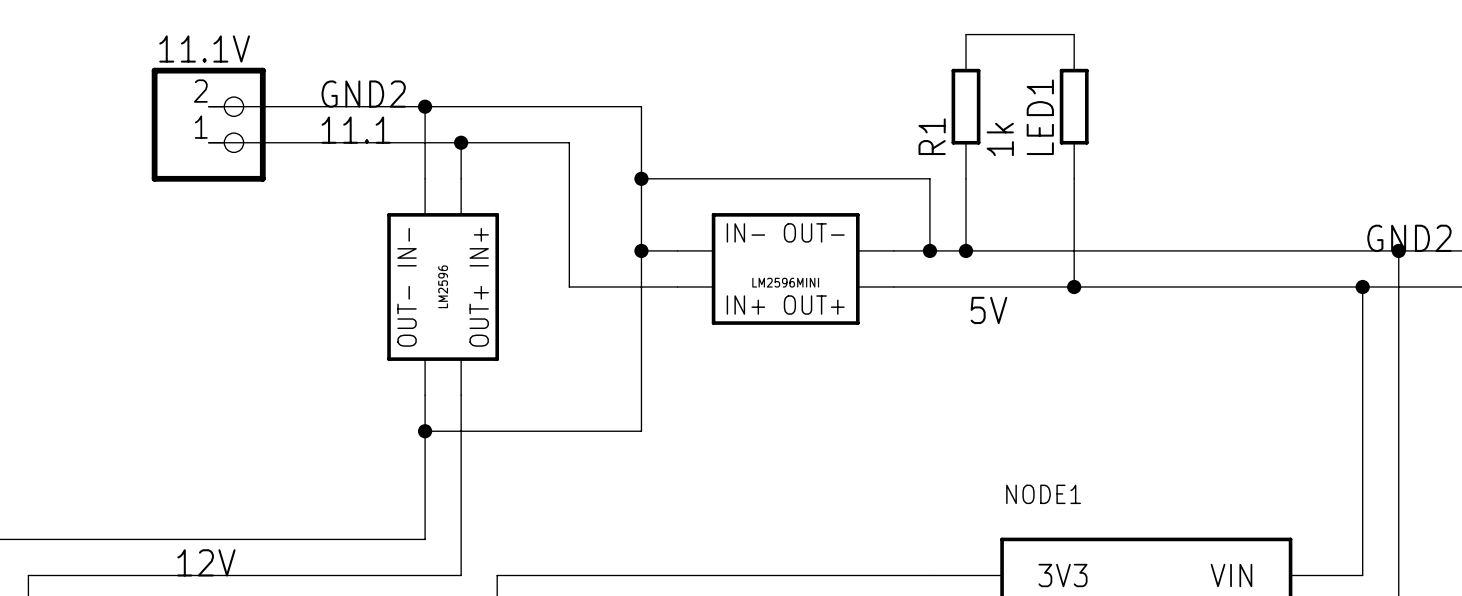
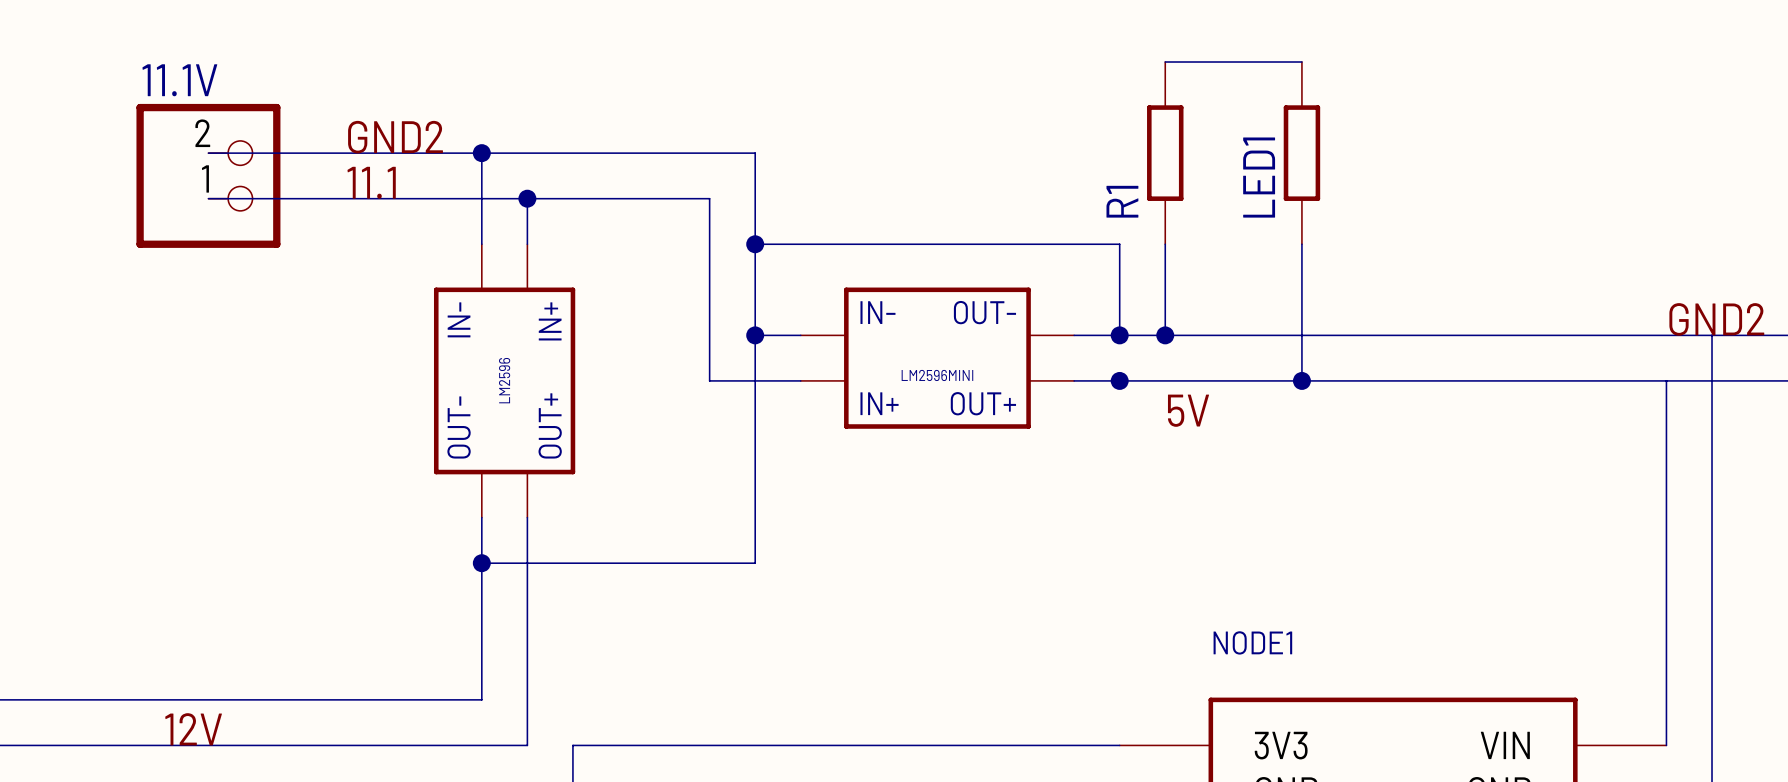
R1 value: 1k (1000, 139) -> none
wire: (569, 142) (569, 286) (605, 286) -> (664, 198) (709, 198) (709, 380)
junction: (1398, 250) -> none
junction: none -> (1119, 380)
junction: (1362, 286) -> none

